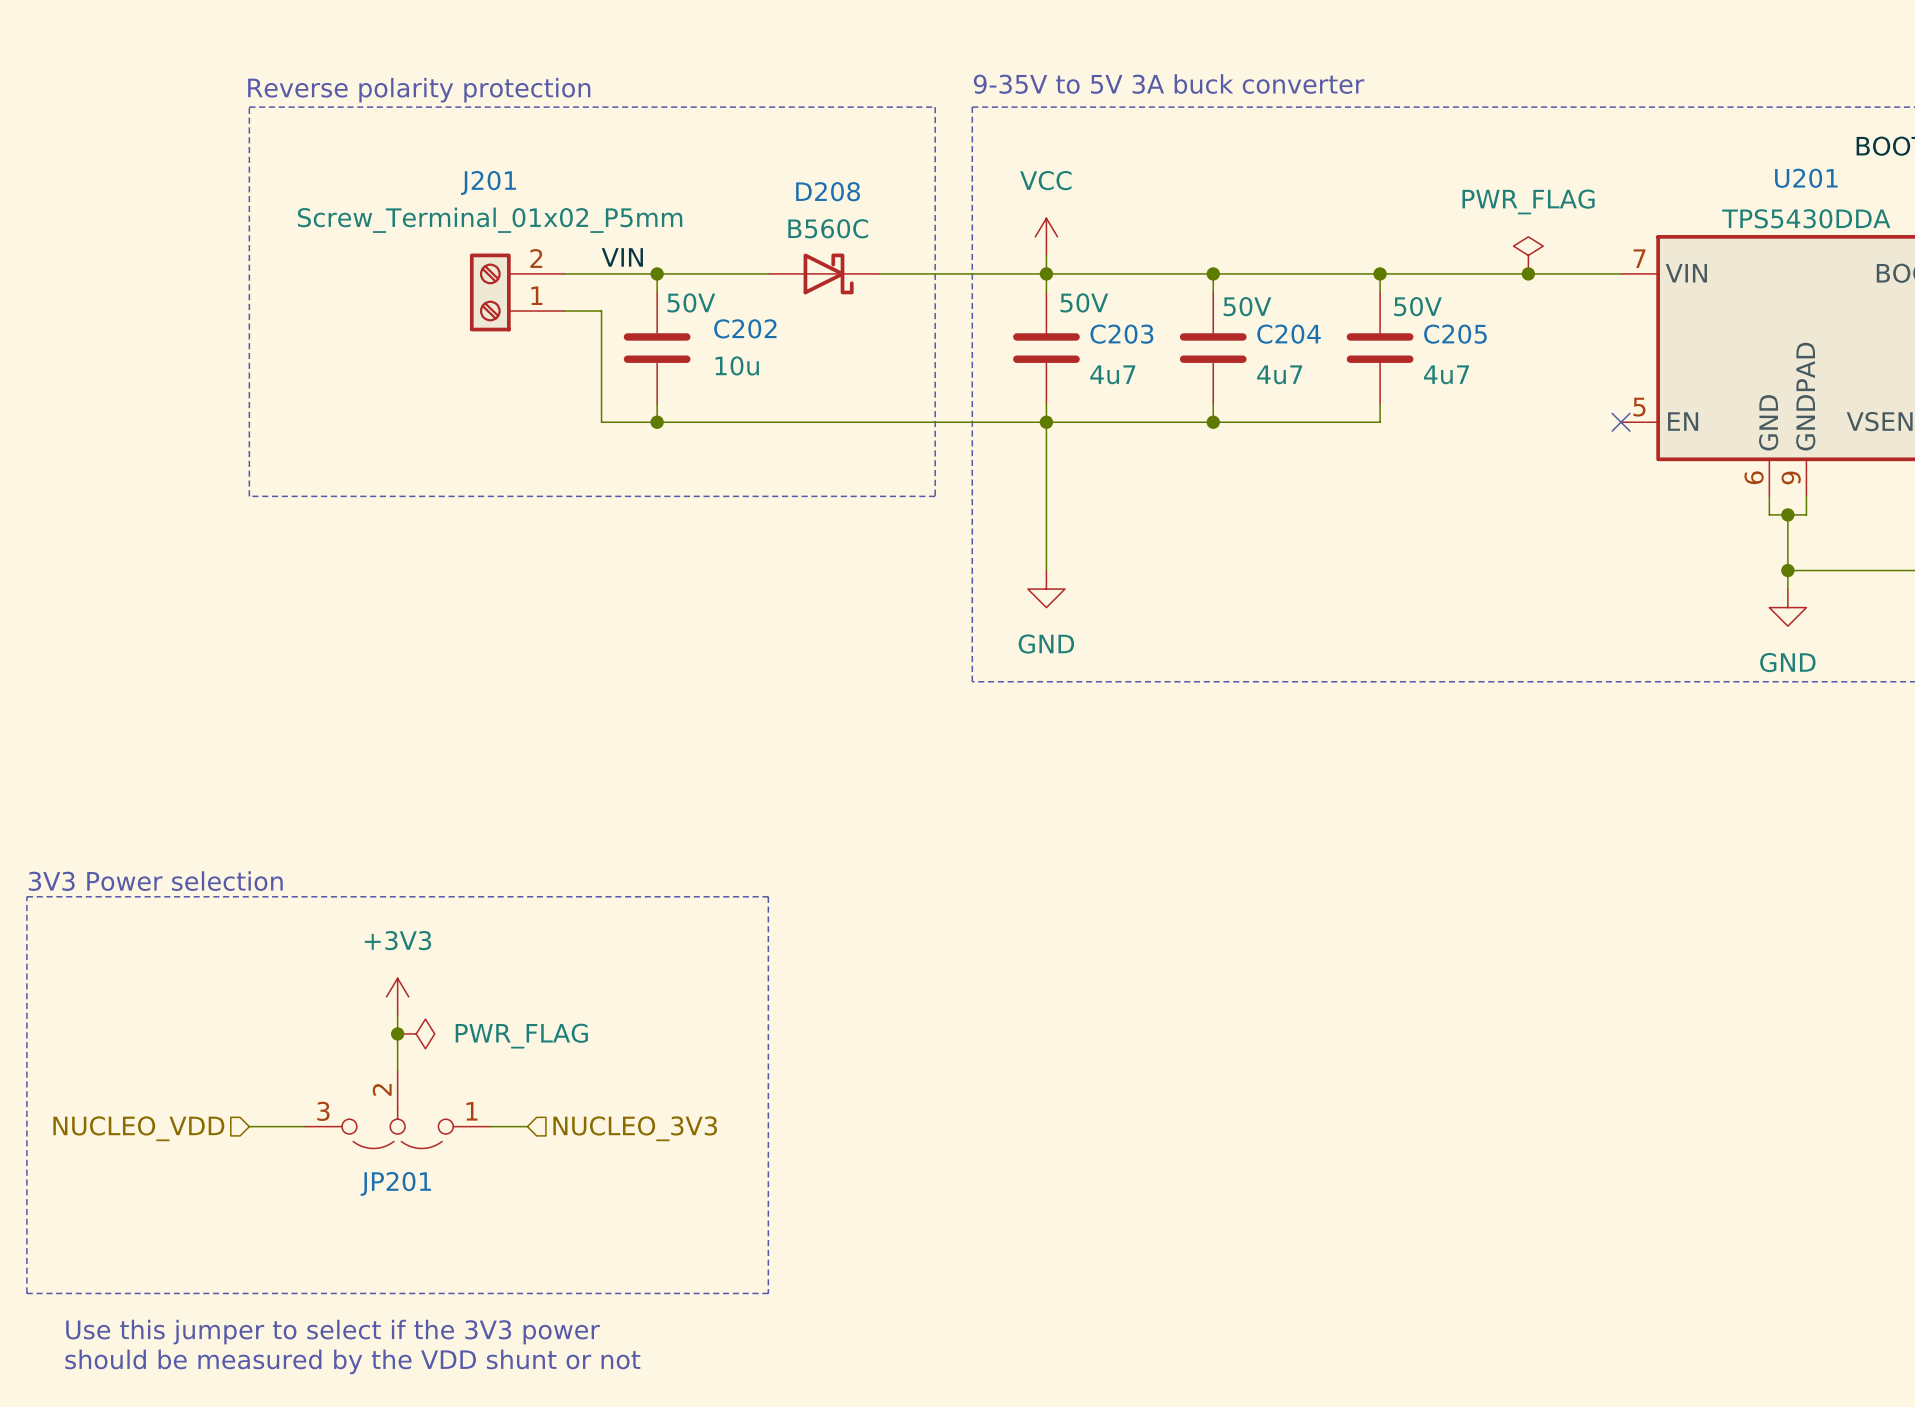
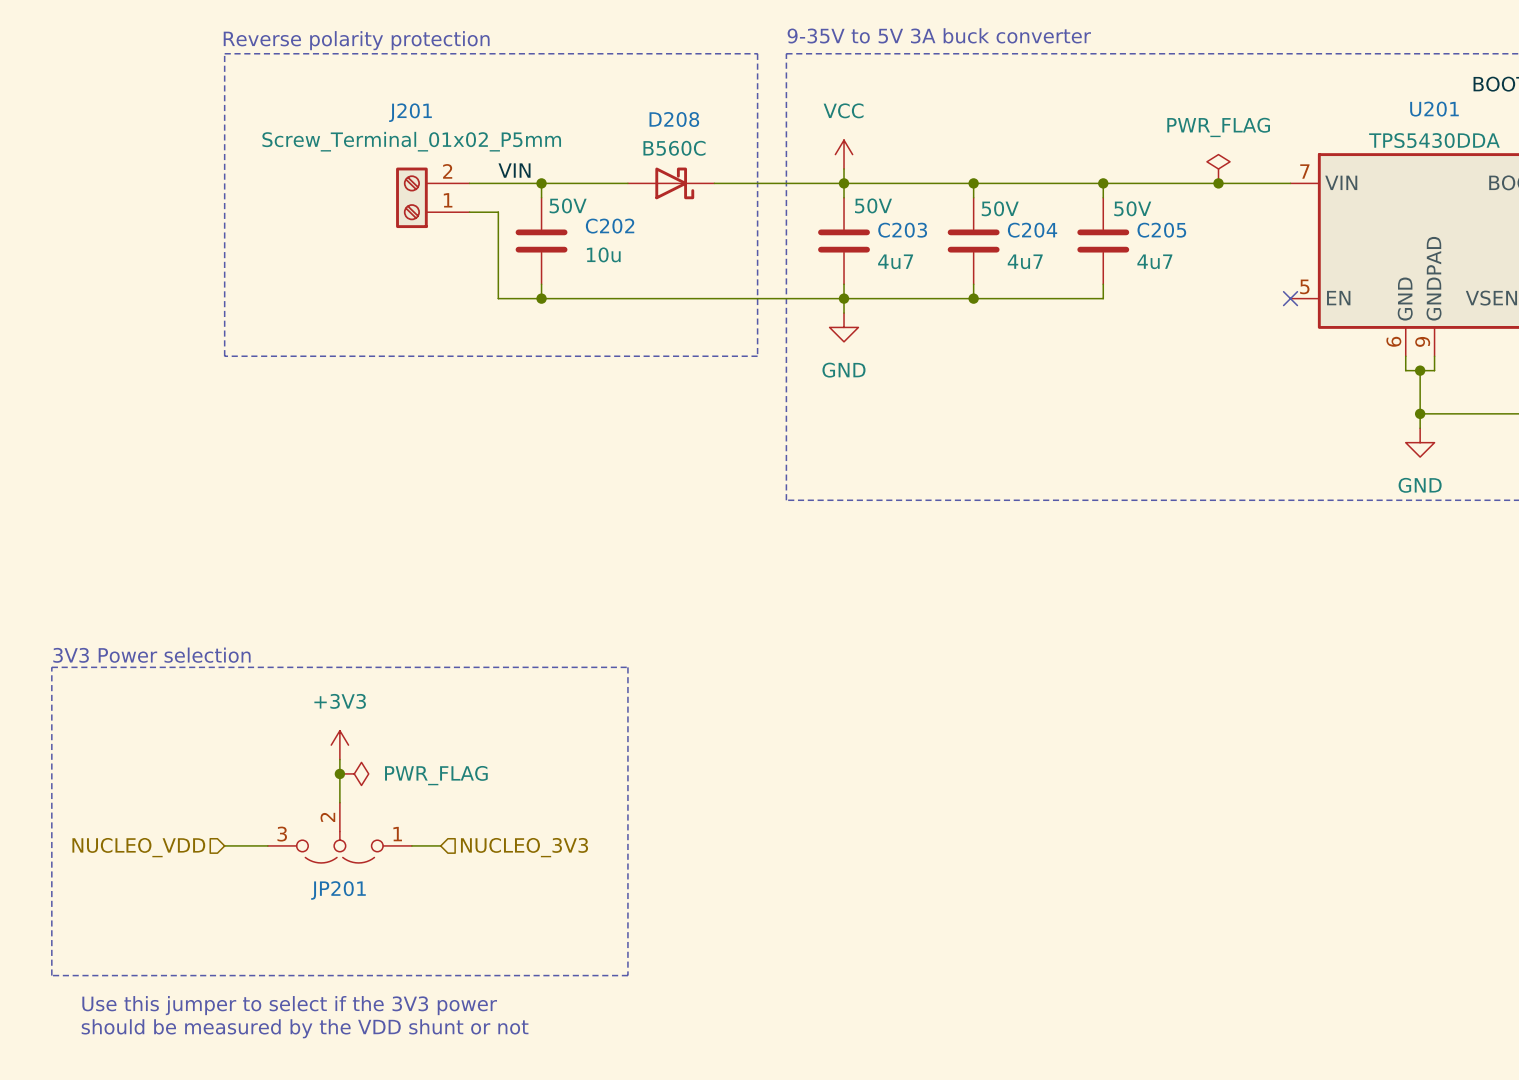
wire: (1046, 440) (1046, 570) -> none
power symbol position: GND (1046, 589) -> GND (844, 327)

